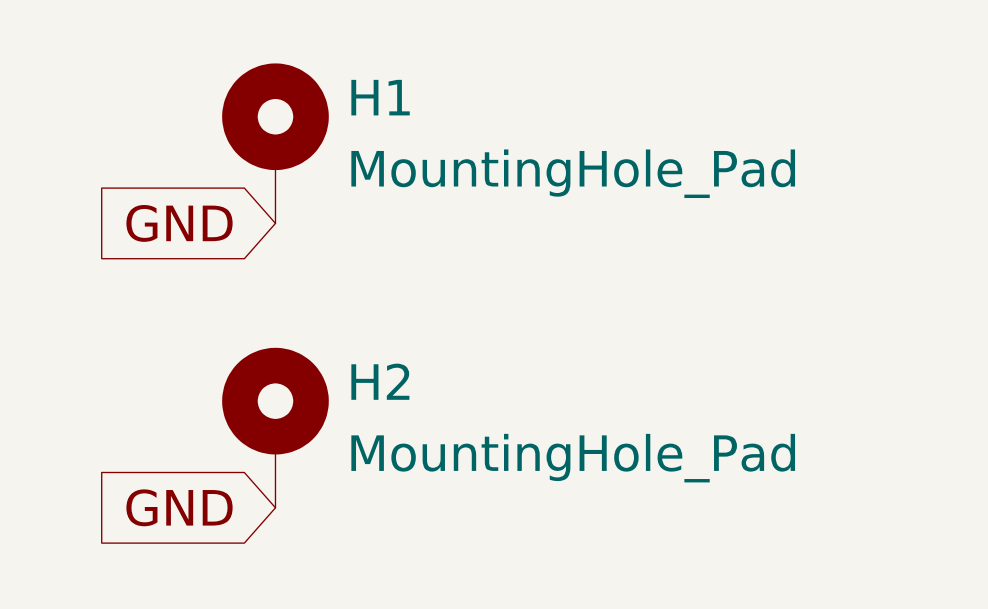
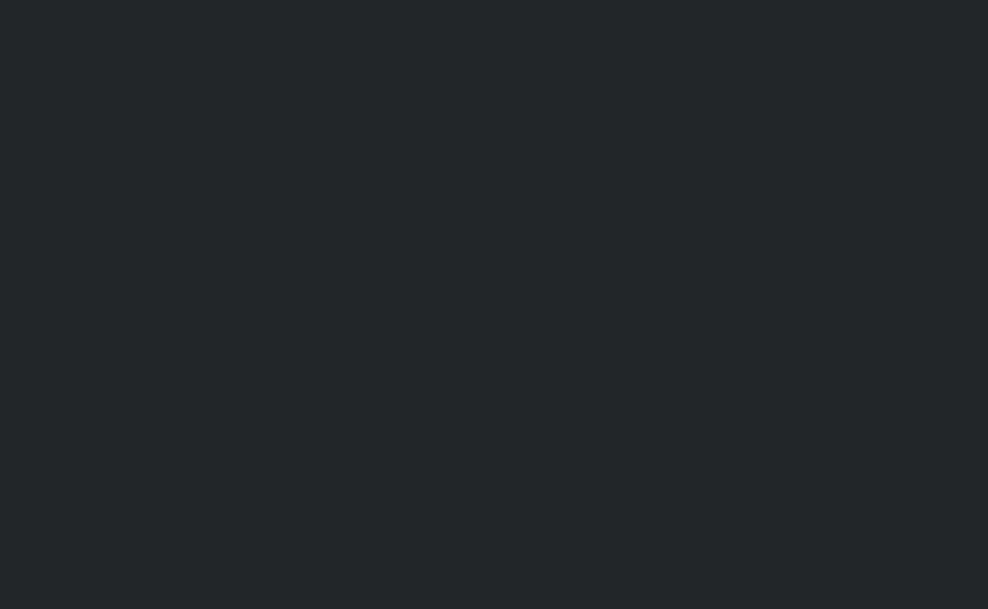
H1: MountingHole_Pad (275, 143) -> none
global label: GND (179, 223) -> none
H2: MountingHole_Pad (275, 427) -> none
global label: GND (179, 507) -> none

